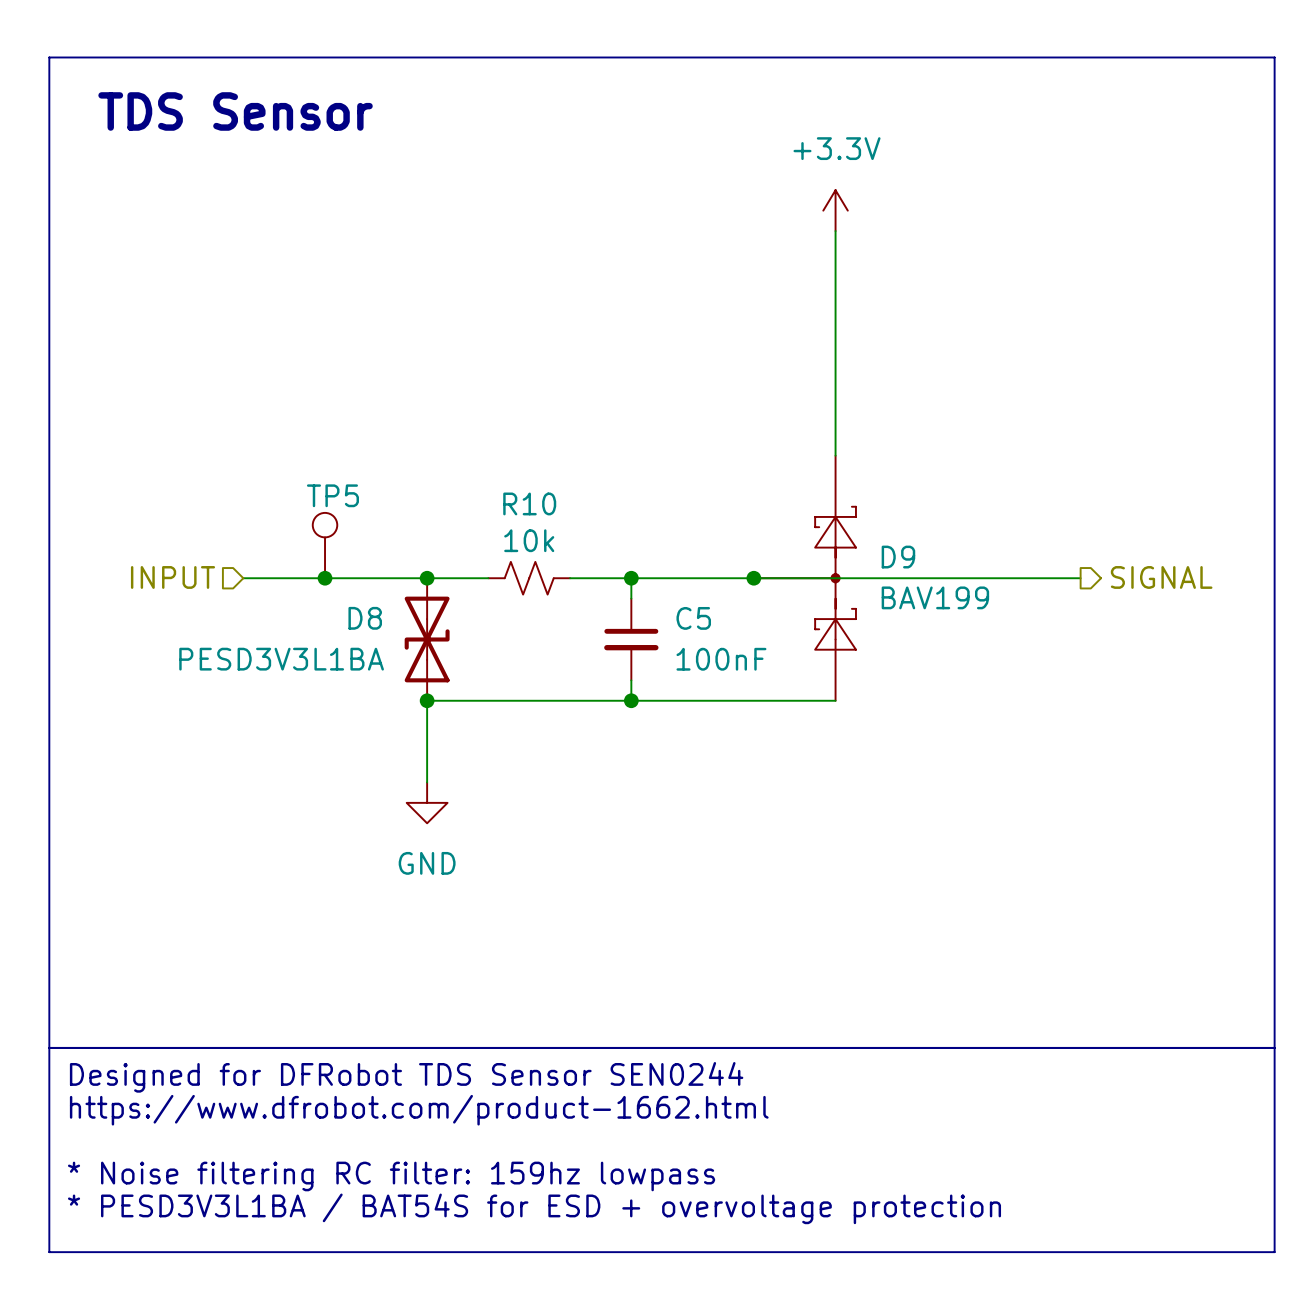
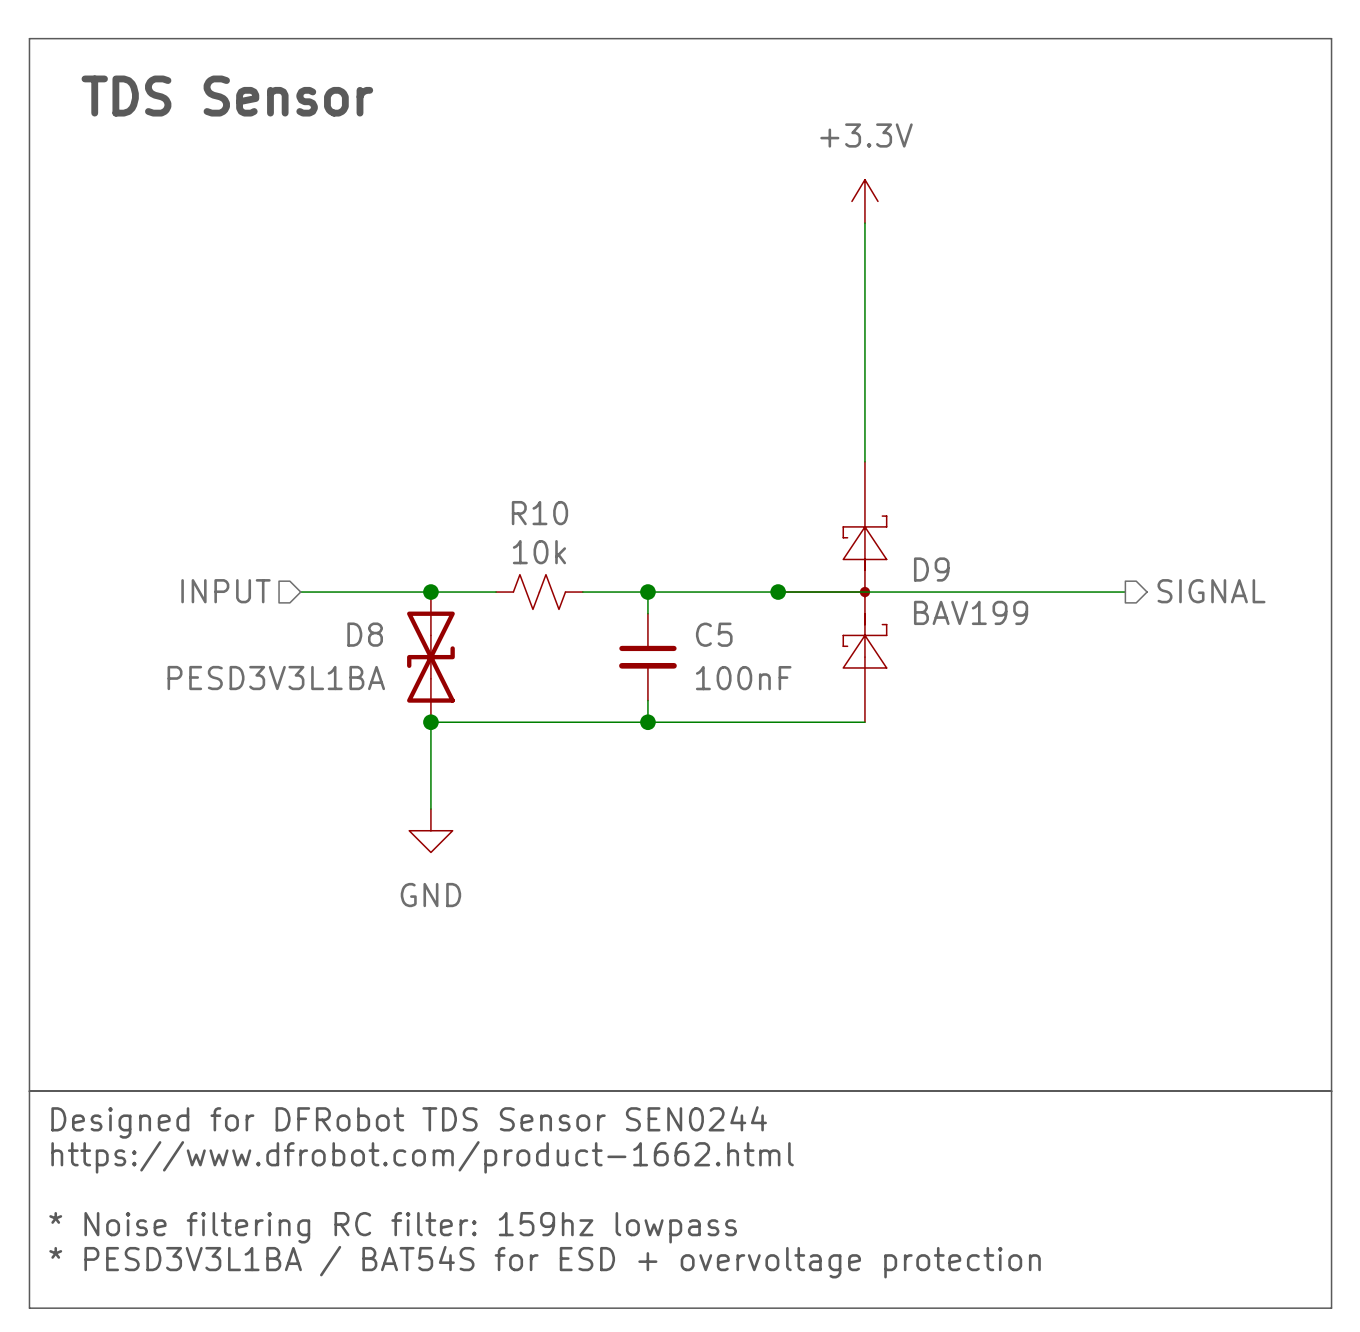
TP5: (325, 545) -> none
hierarchical label position: INPUT (172, 577) -> INPUT (225, 591)
wire: (243, 578) (304, 578) -> none
junction: (325, 578) -> none

